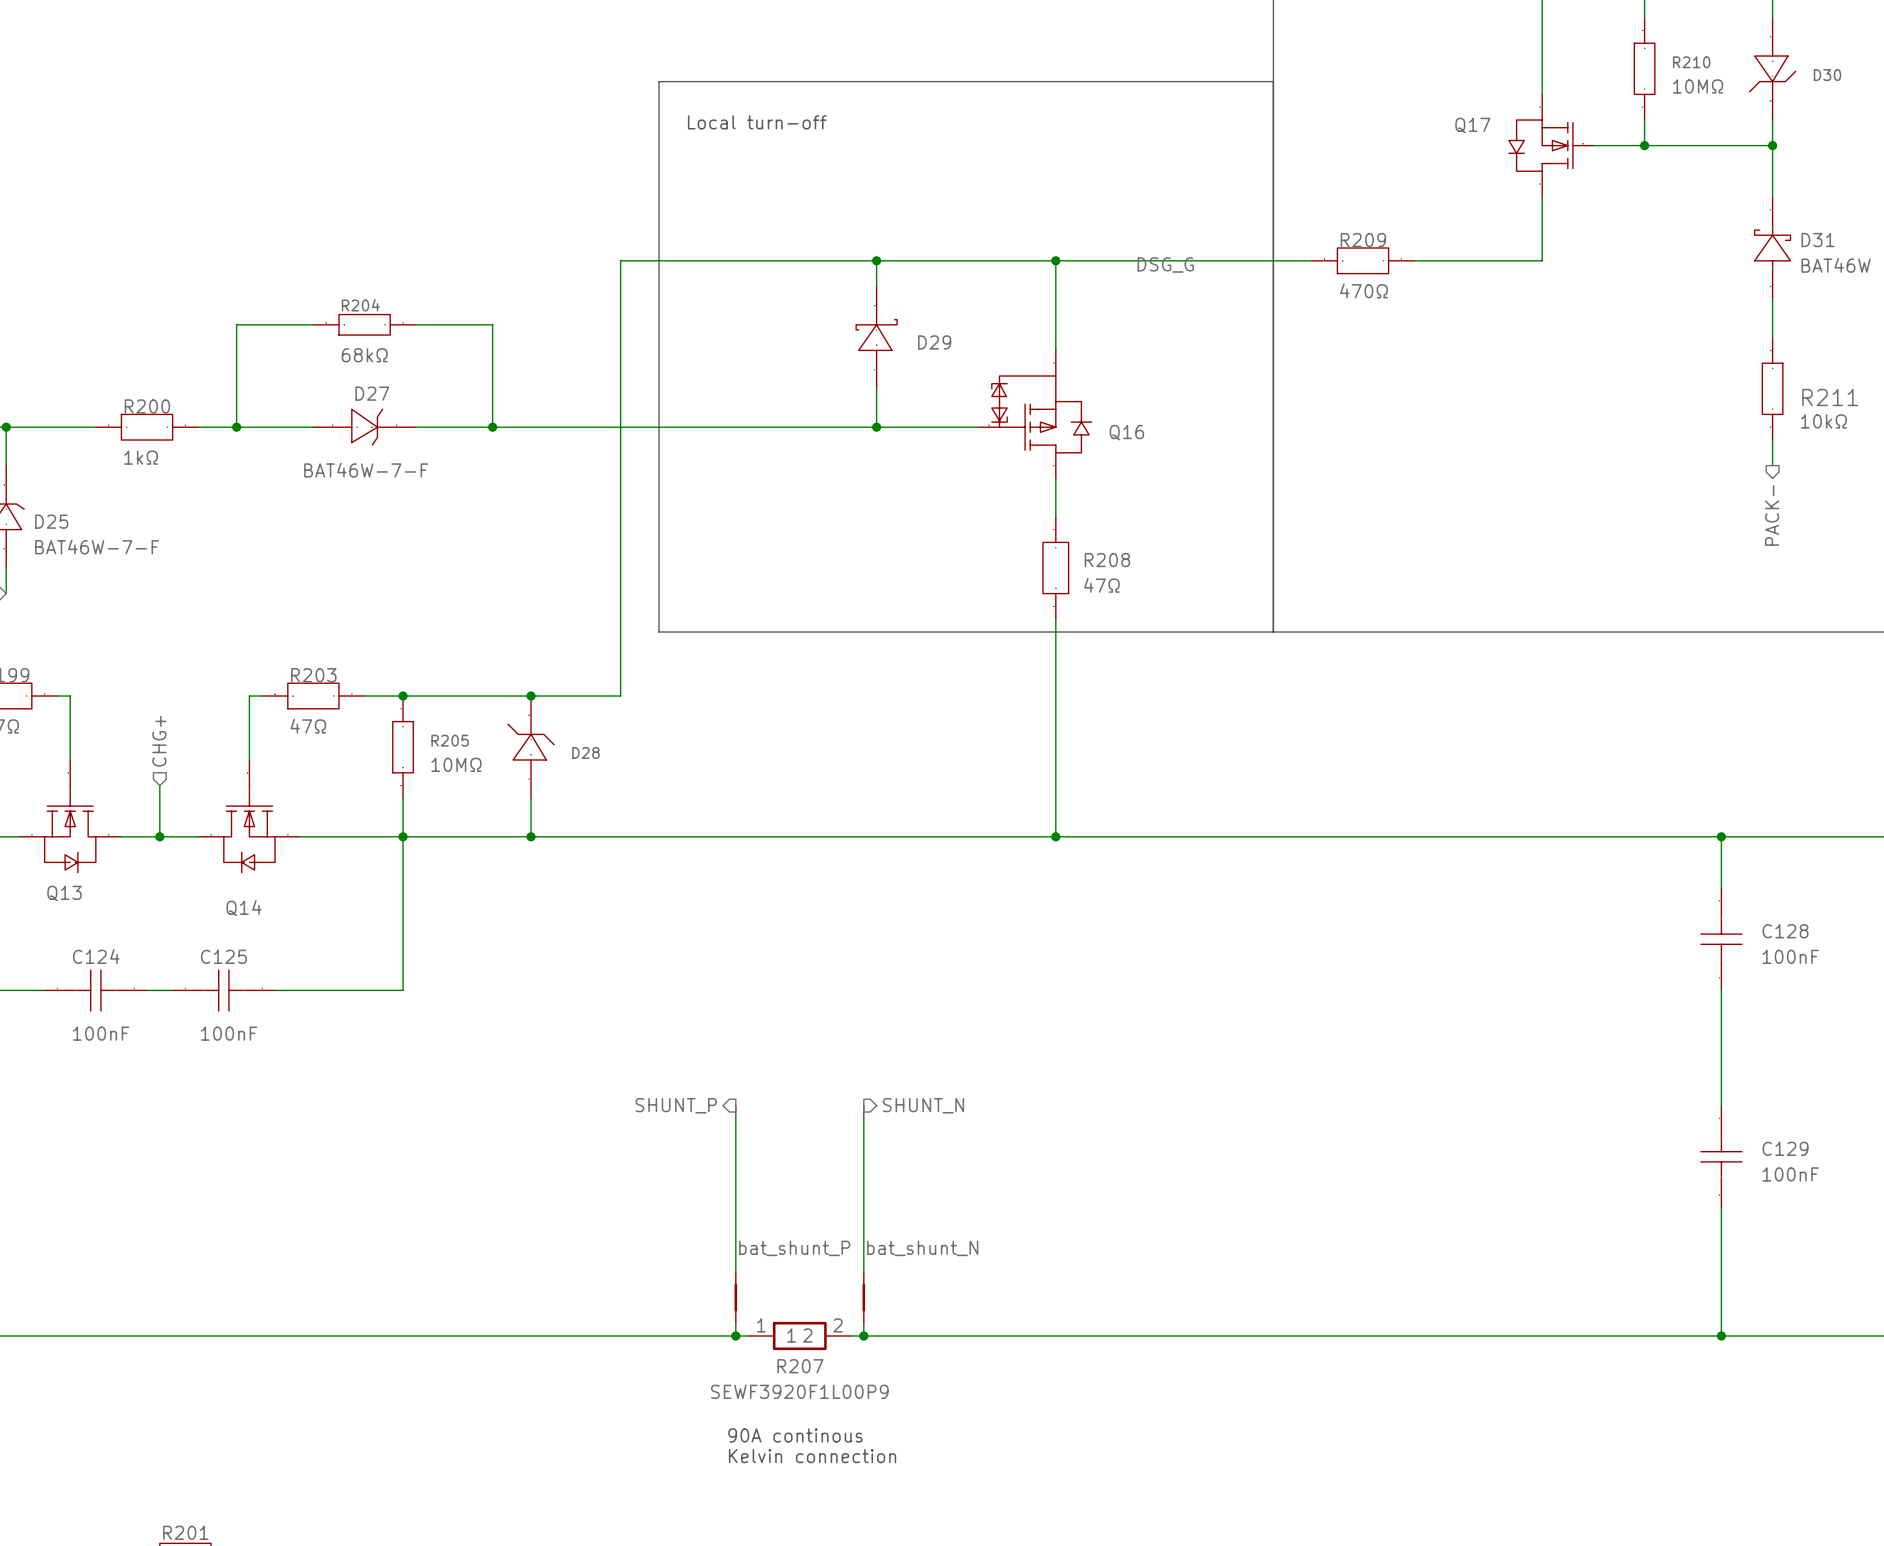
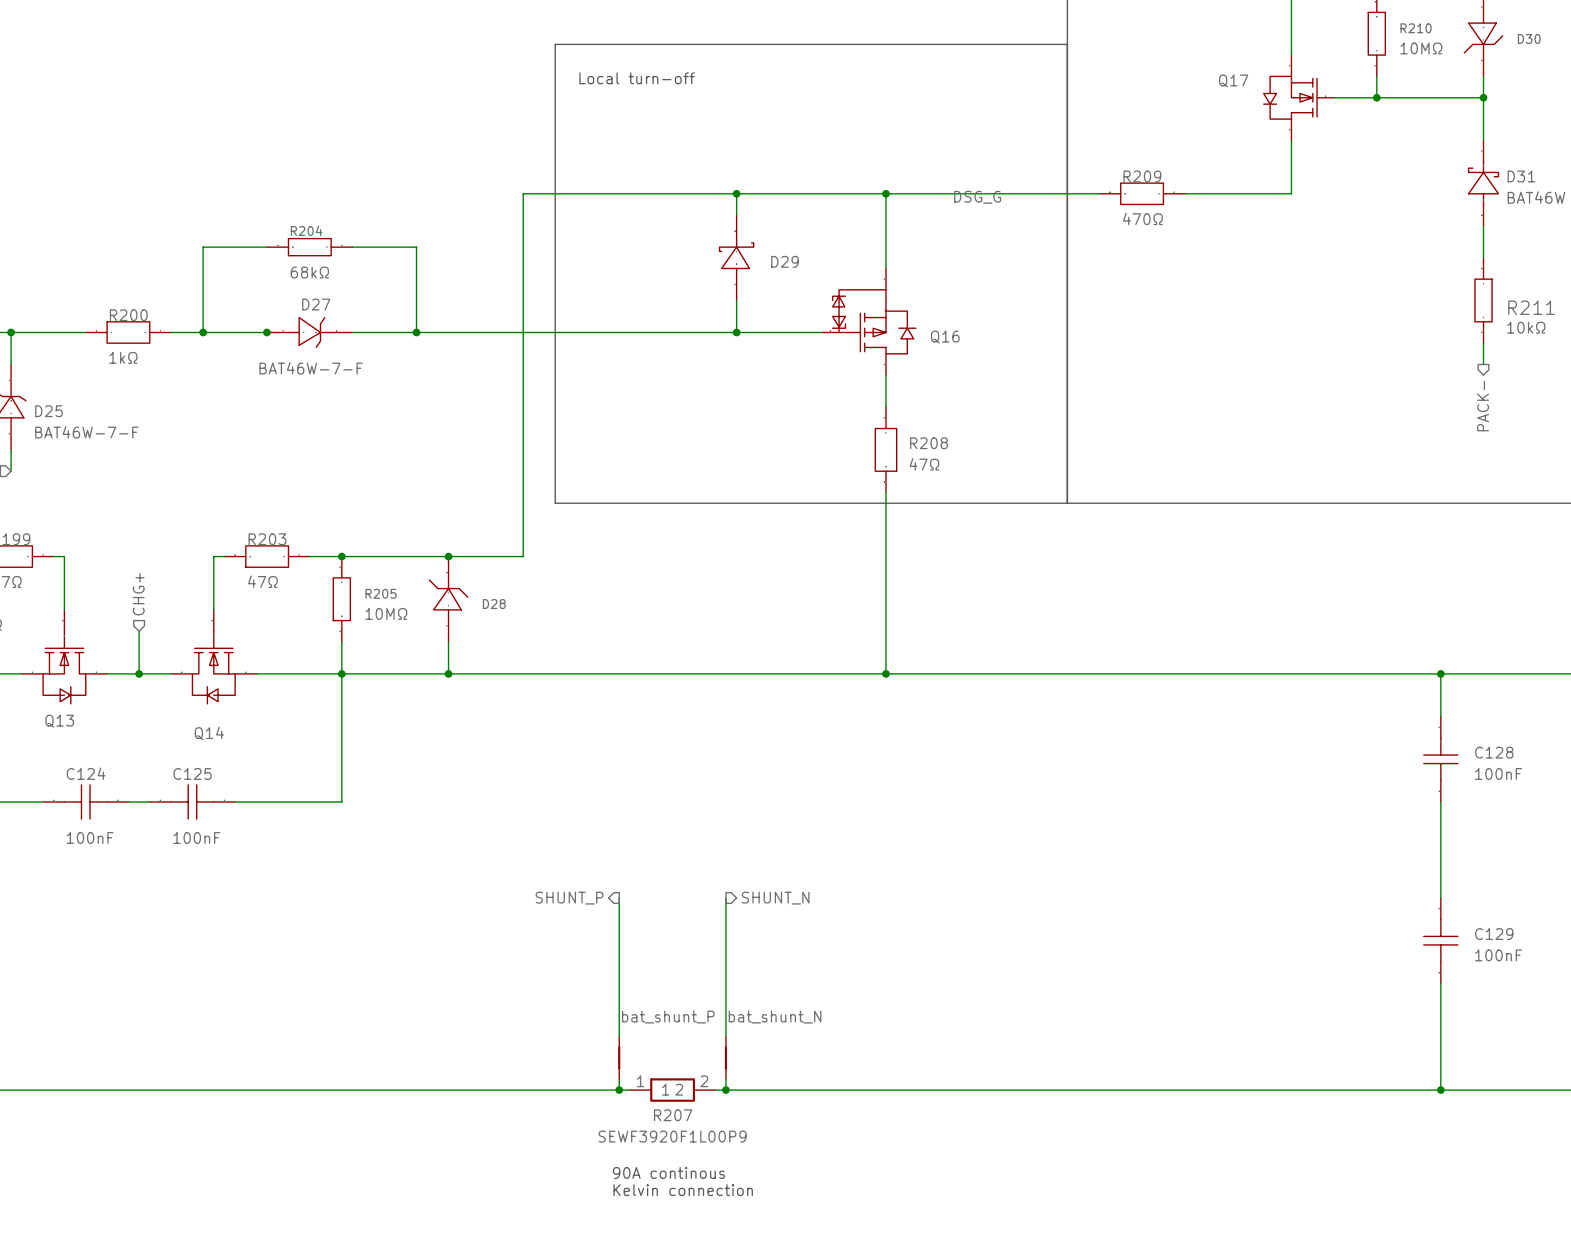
junction: none -> (266, 332)

